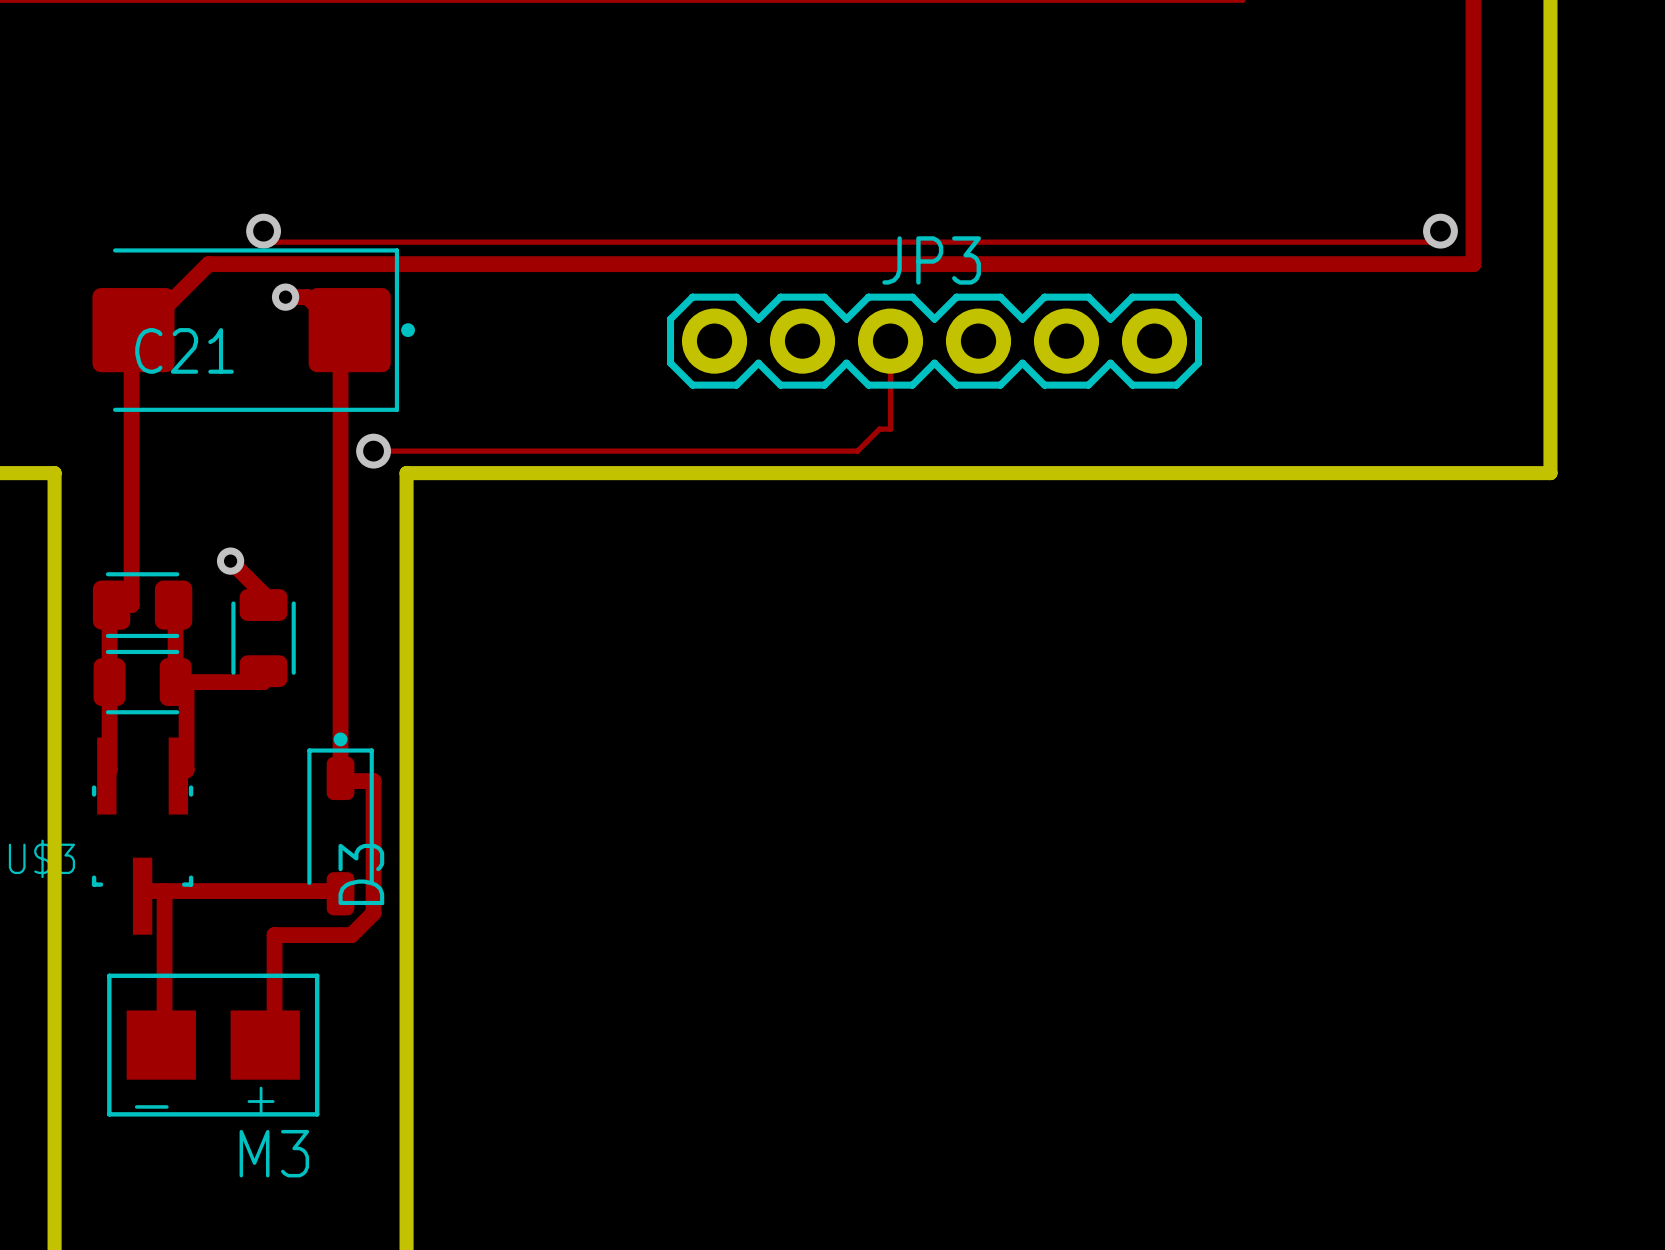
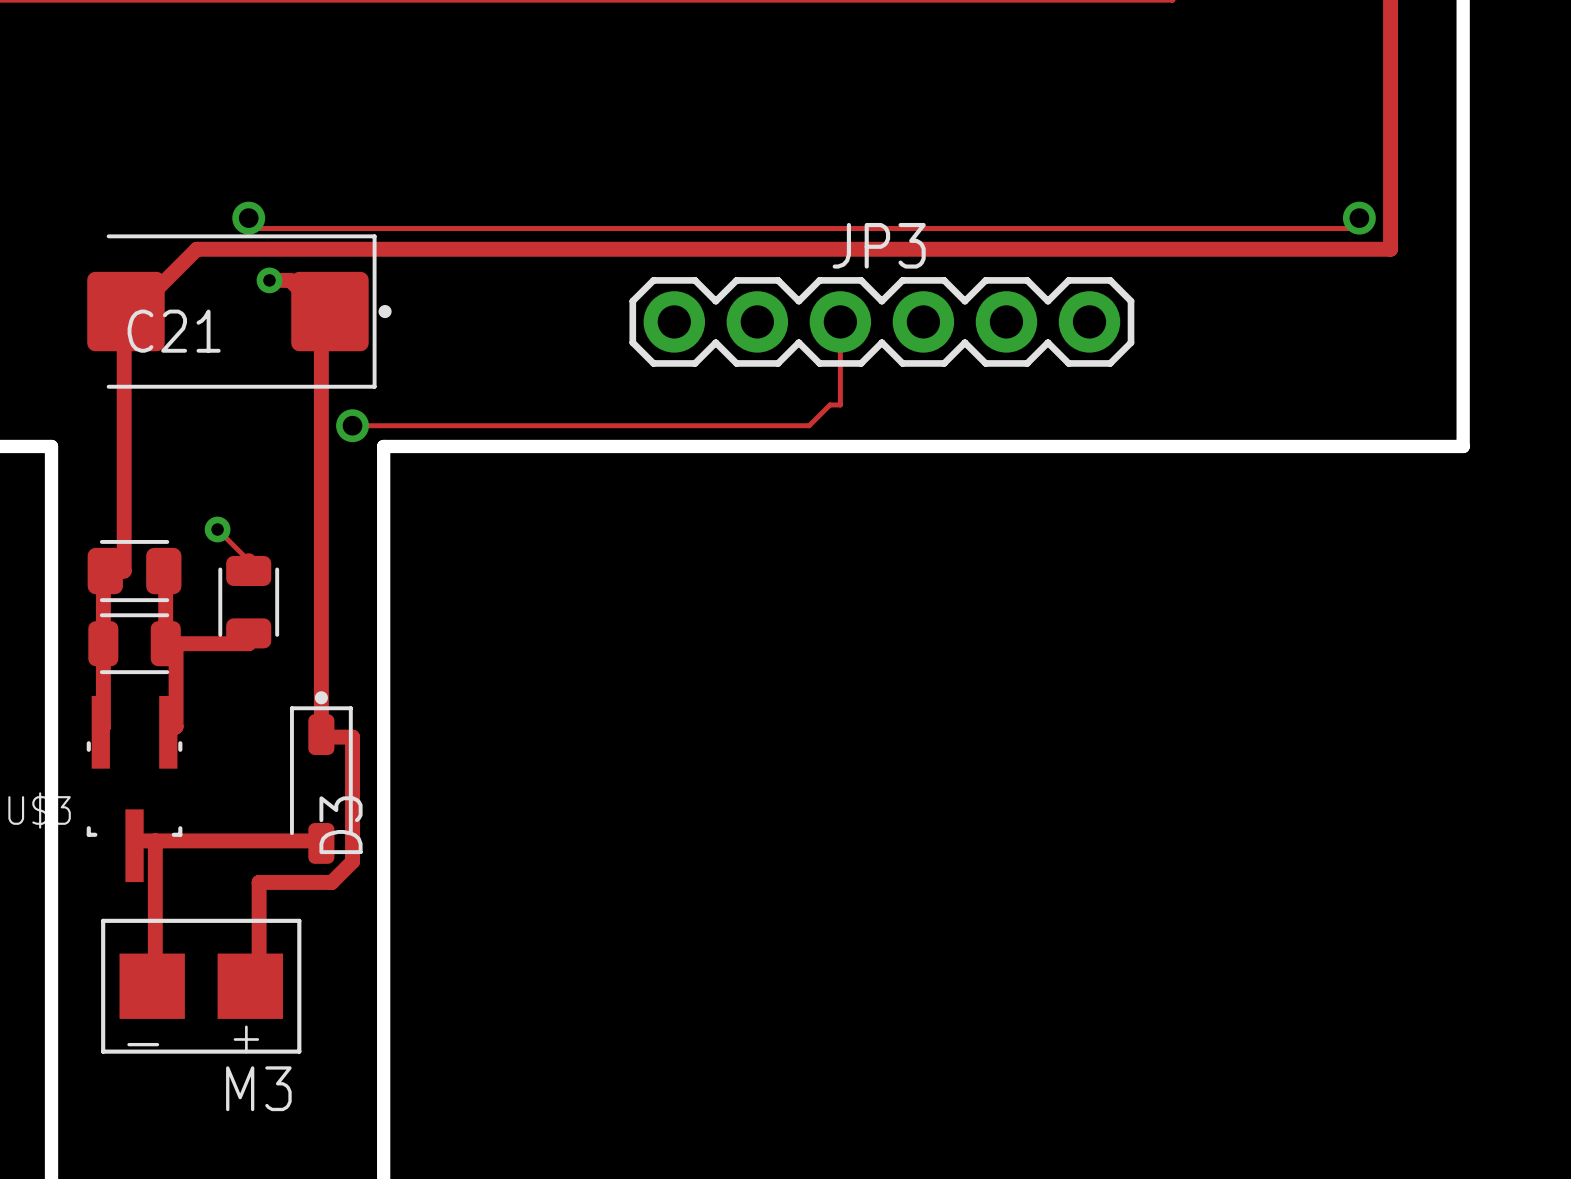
track width: thick (230, 561) (263, 594) -> thin (217, 529) (248, 560)

